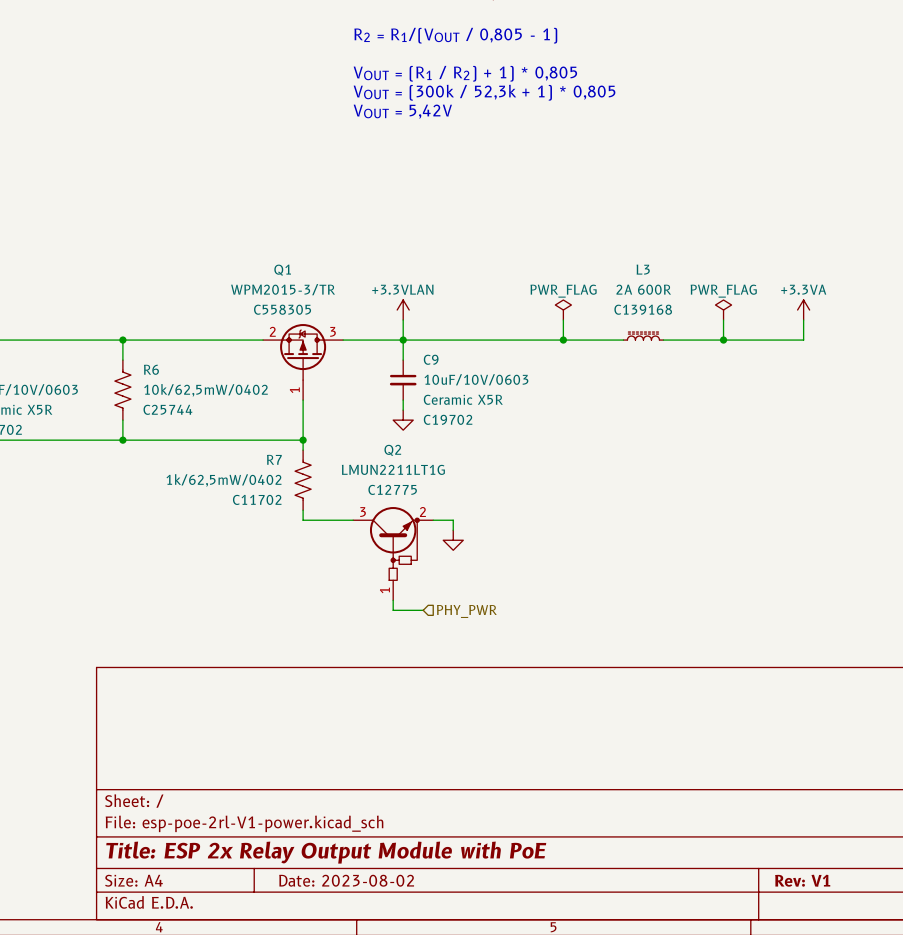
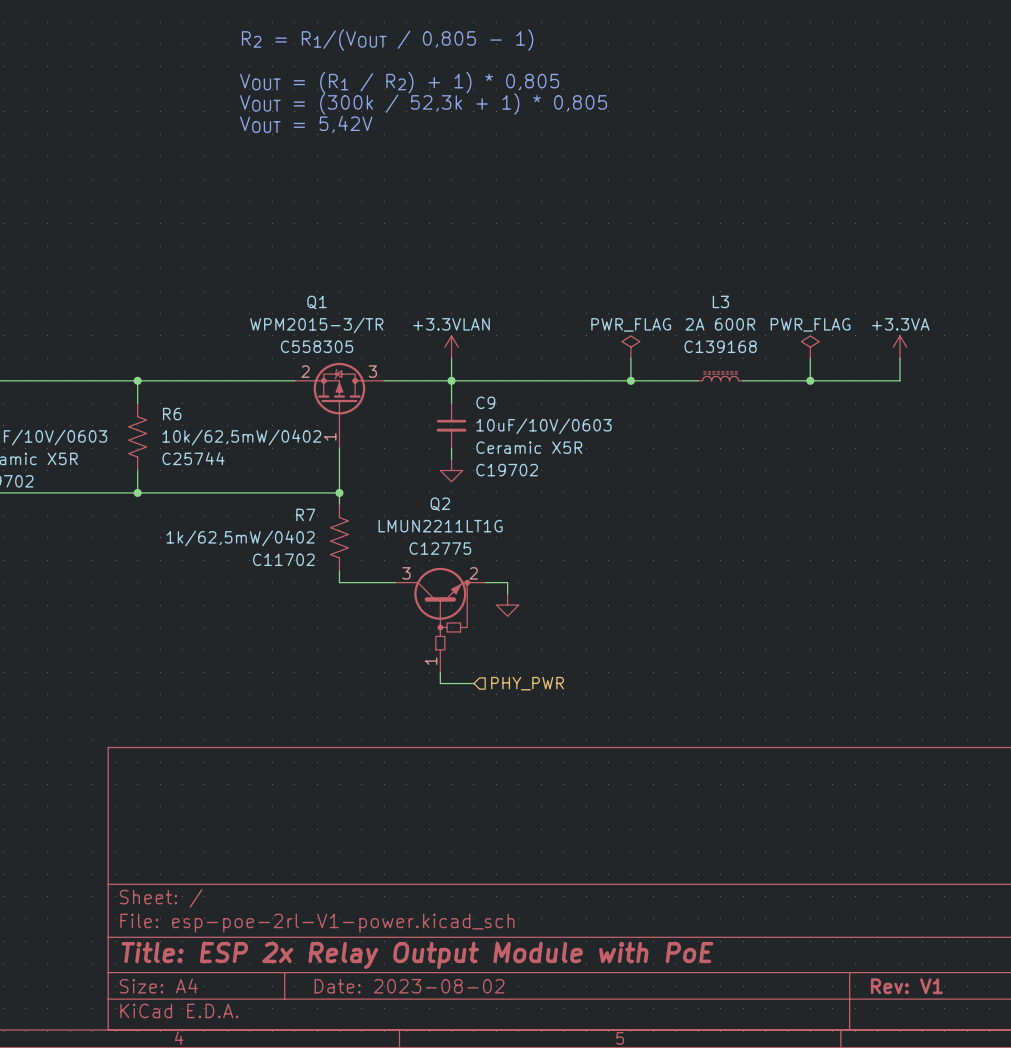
text position: R2 = R1/(VOUT / 0,805 - 1) (455, 35) -> R2 = R1/(VOUT / 0,805 - 1) (387, 40)
text position: VOUT = (R1 / R2) + 1) * 0,805 (465, 73) -> VOUT = (R1 / R2) + 1) * 0,805 (399, 82)
text position: VOUT = (300k / 52,3k + 1) * 0,805 (484, 92) -> VOUT = (300k / 52,3k + 1) * 0,805 (423, 104)
text position: VOUT = 5,42V (402, 111) -> VOUT = 5,42V (306, 124)

